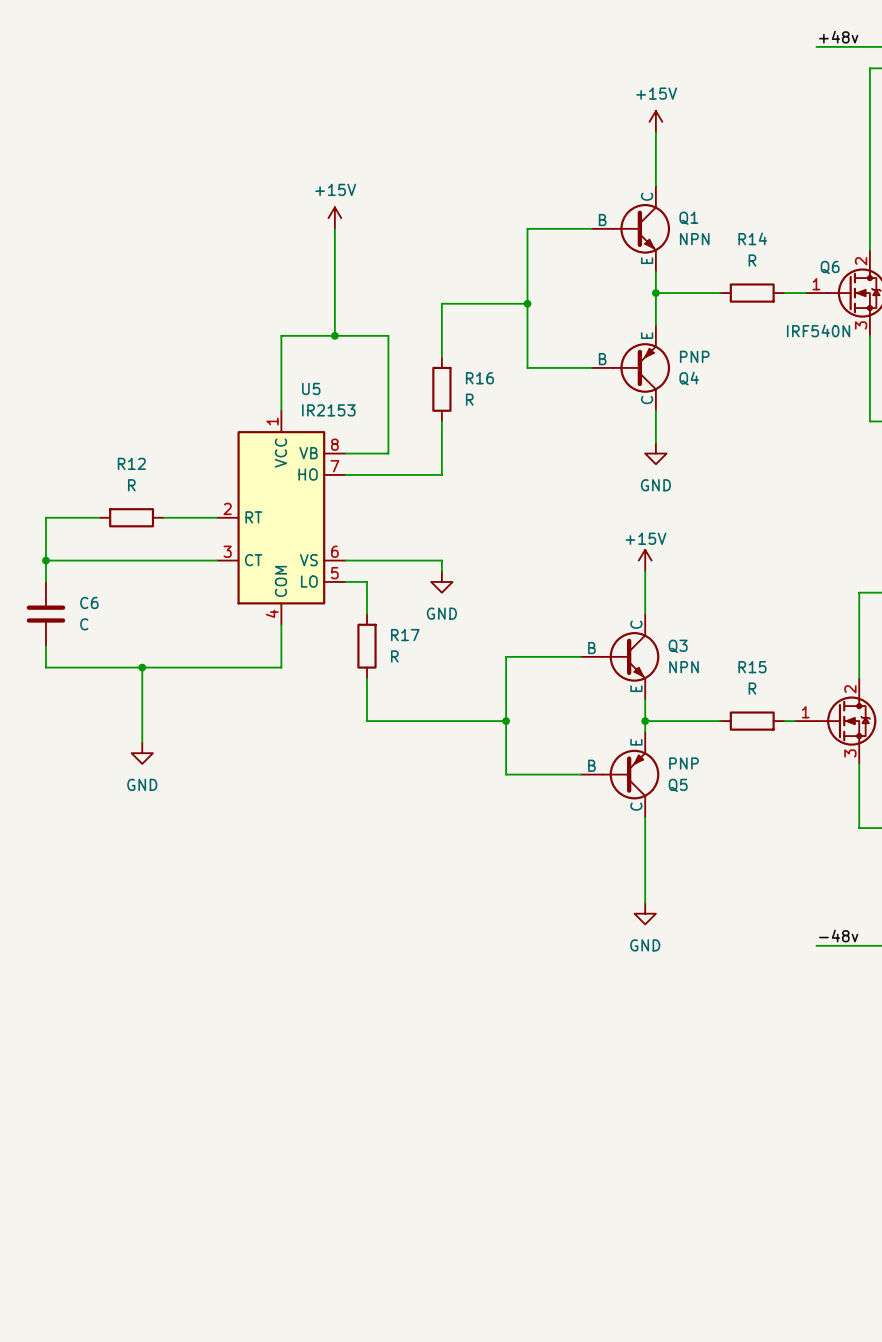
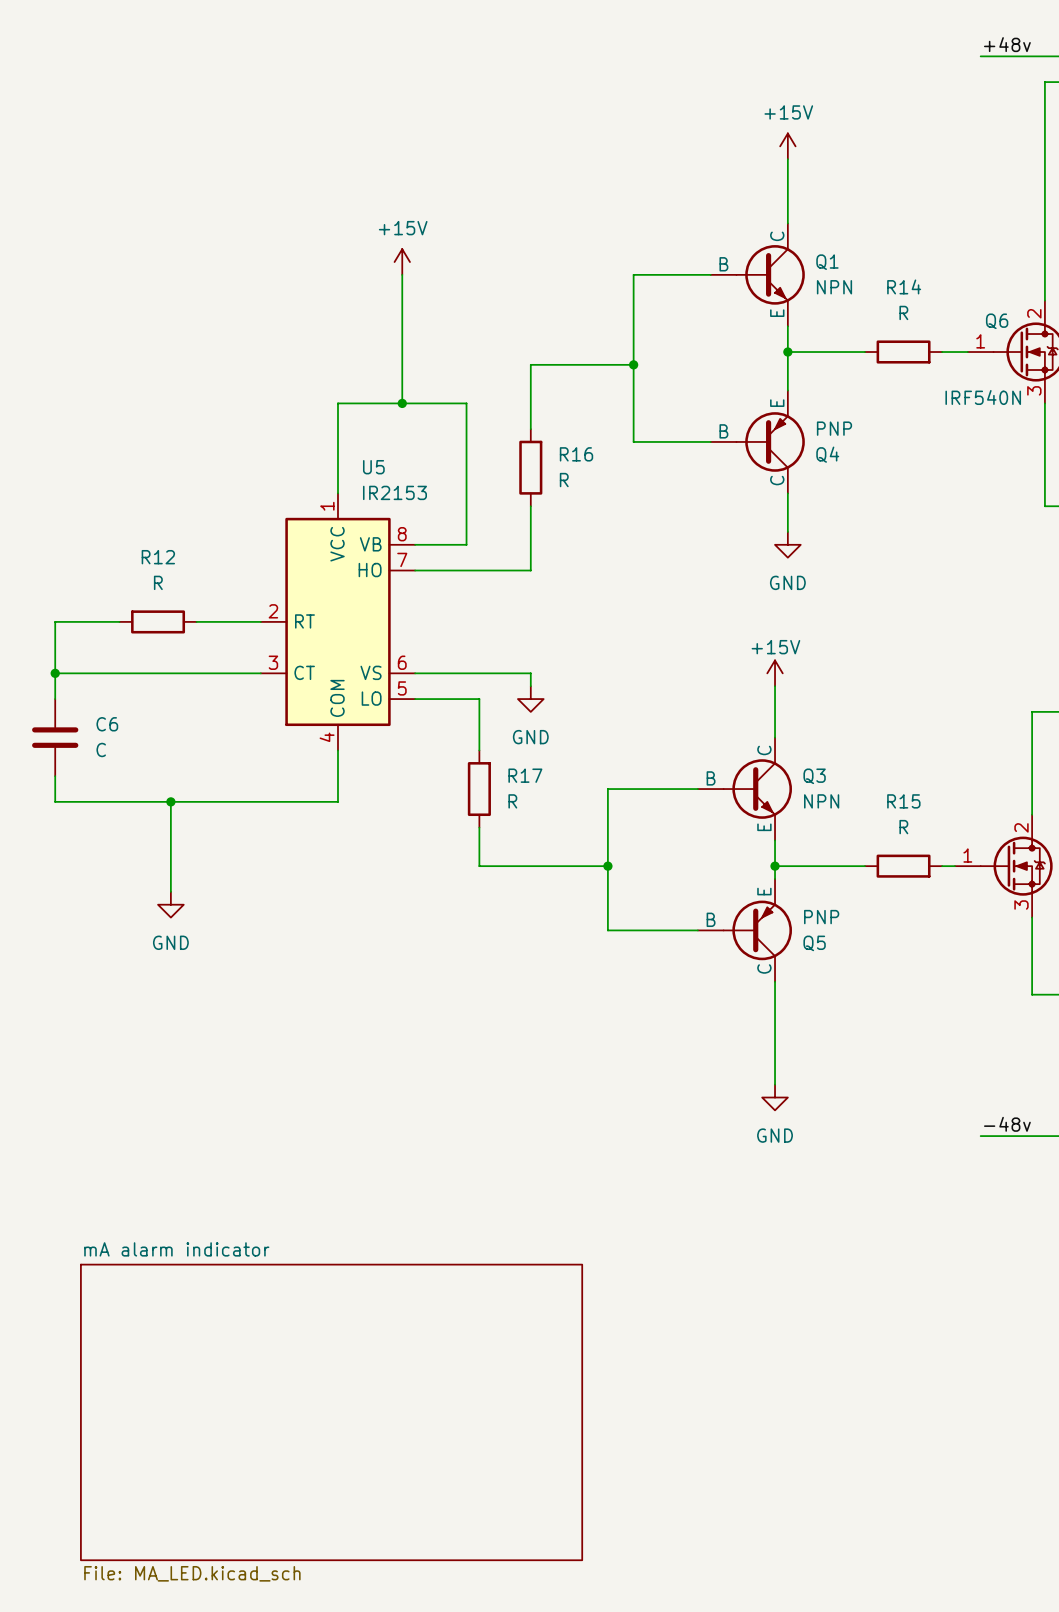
wire: (366, 581) (366, 614) -> (440, 699) (479, 699) (479, 750)
R17 position: (366, 646) -> (479, 789)
wire: (366, 678) (366, 721) (399, 721) -> (479, 827) (479, 866)
sheet mA alarm indicator: none -> File: MA_LED.kicad_sch (331, 1412)

